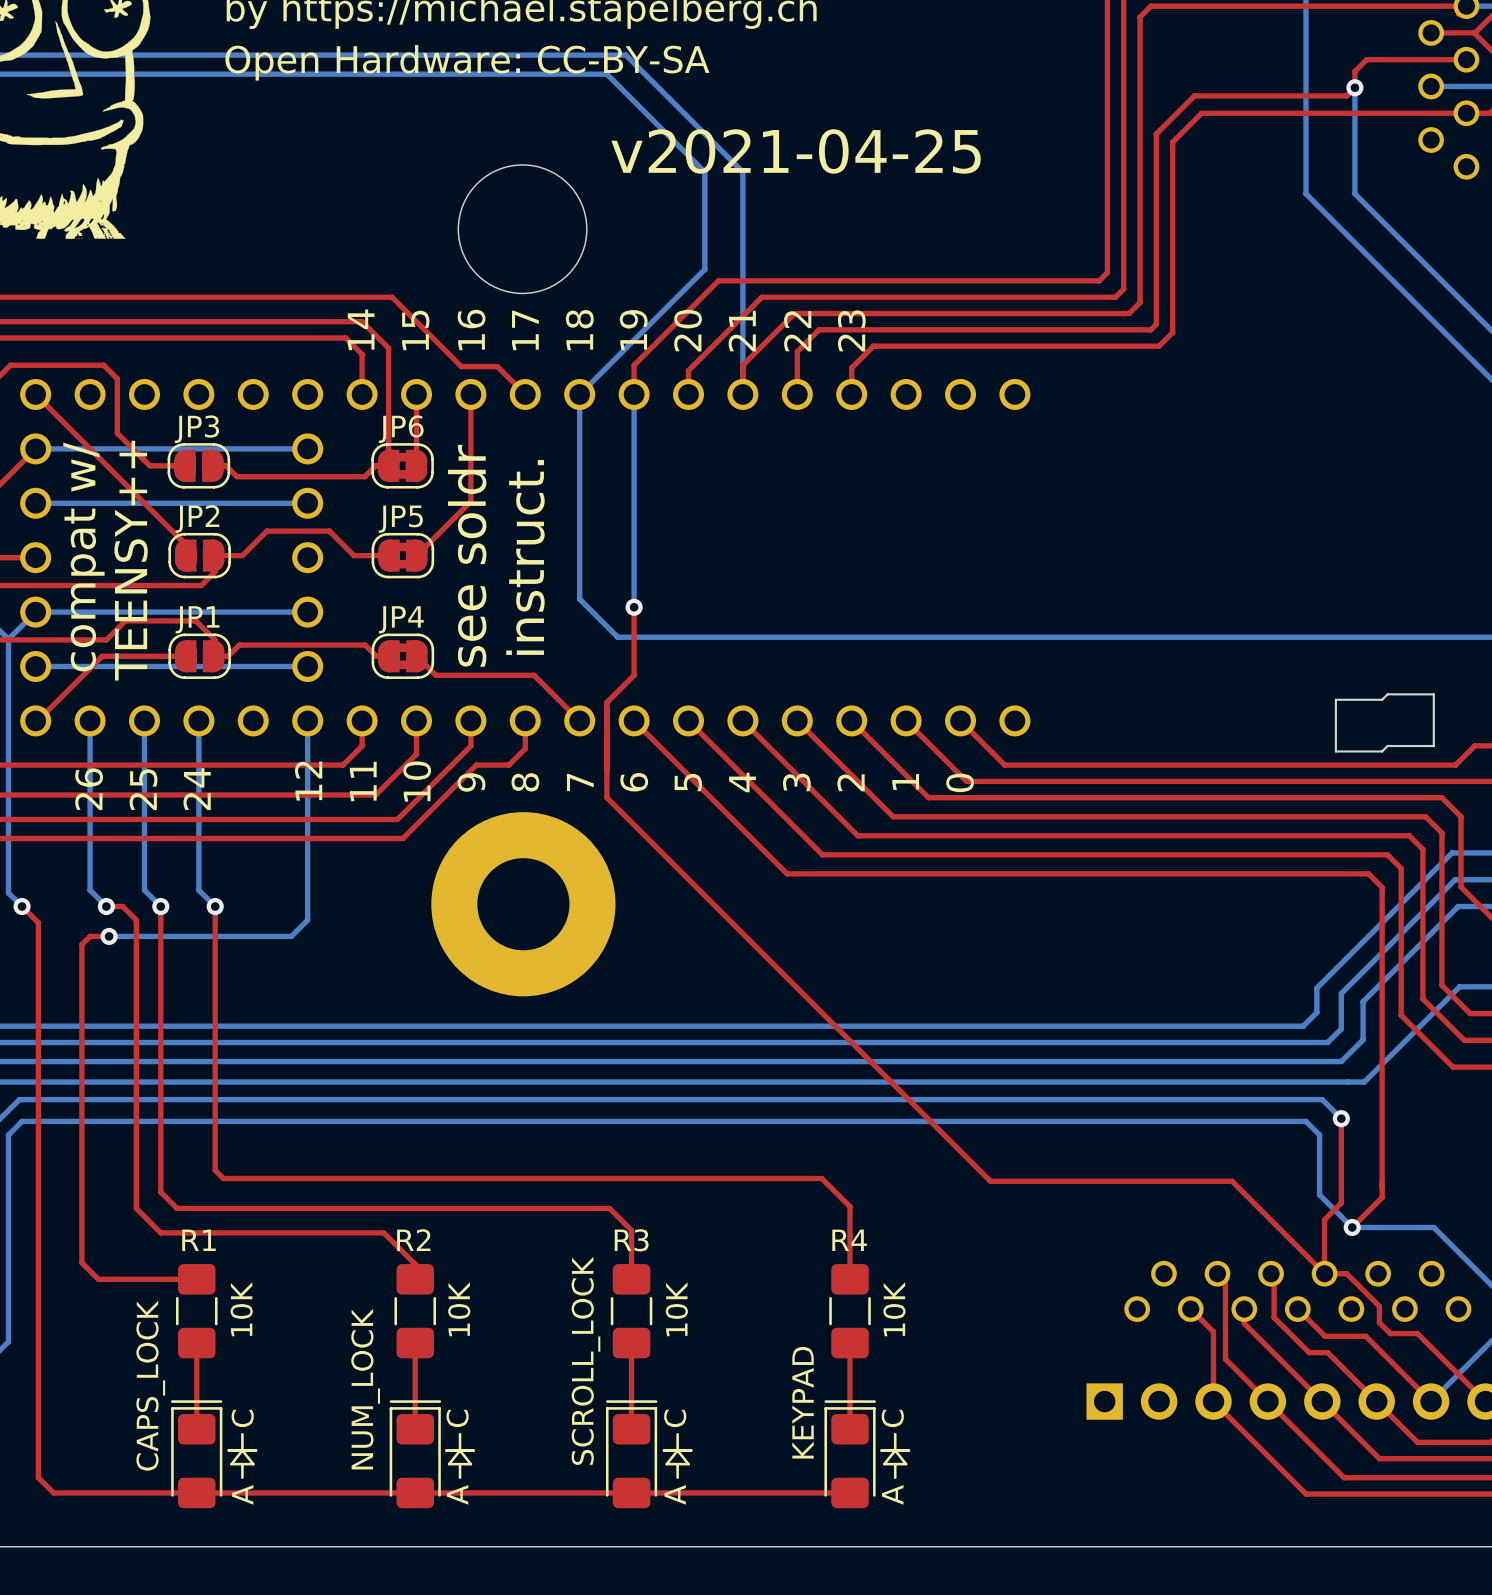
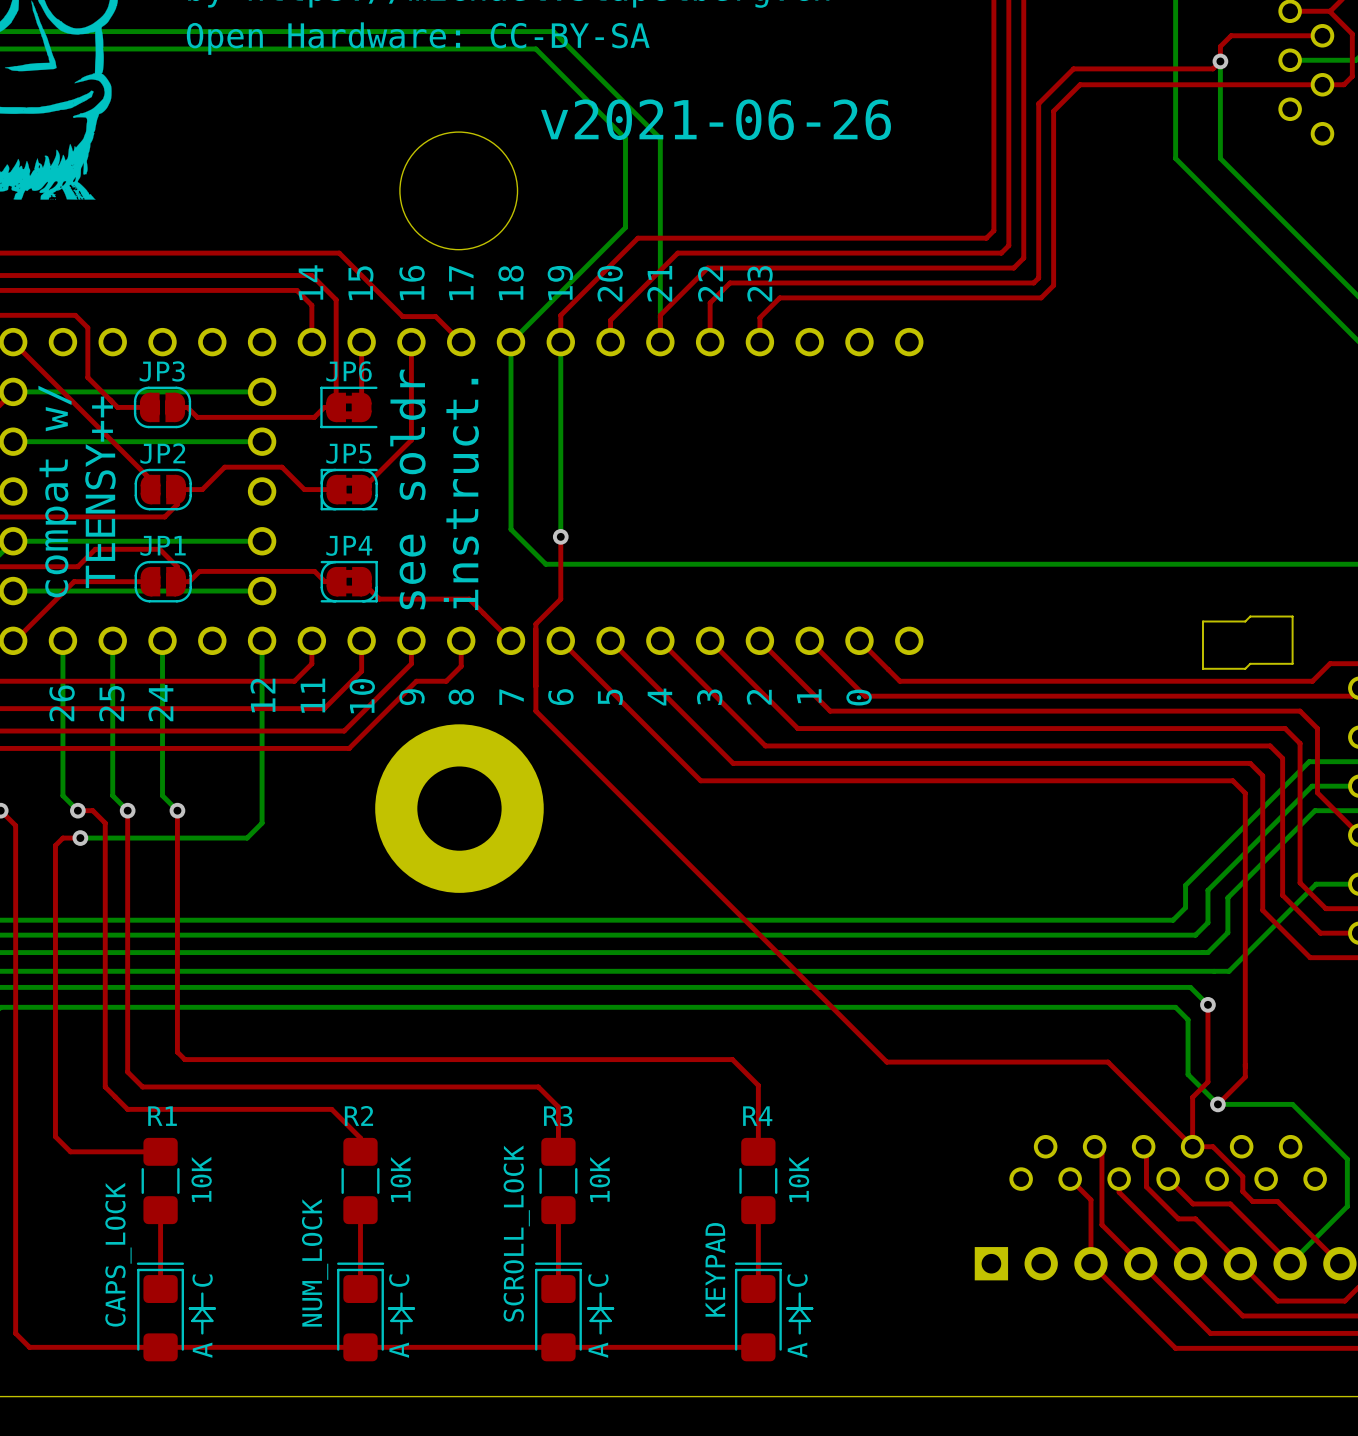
text: v2021-04-25 (796, 151) -> v2021-06-26 (715, 119)
JP6 footprint: [371, 443, 434, 489] -> [320, 386, 378, 429]
JP5 footprint: [371, 532, 435, 579] -> [320, 468, 378, 511]
JP4 footprint: [371, 633, 435, 679] -> [320, 560, 378, 603]

